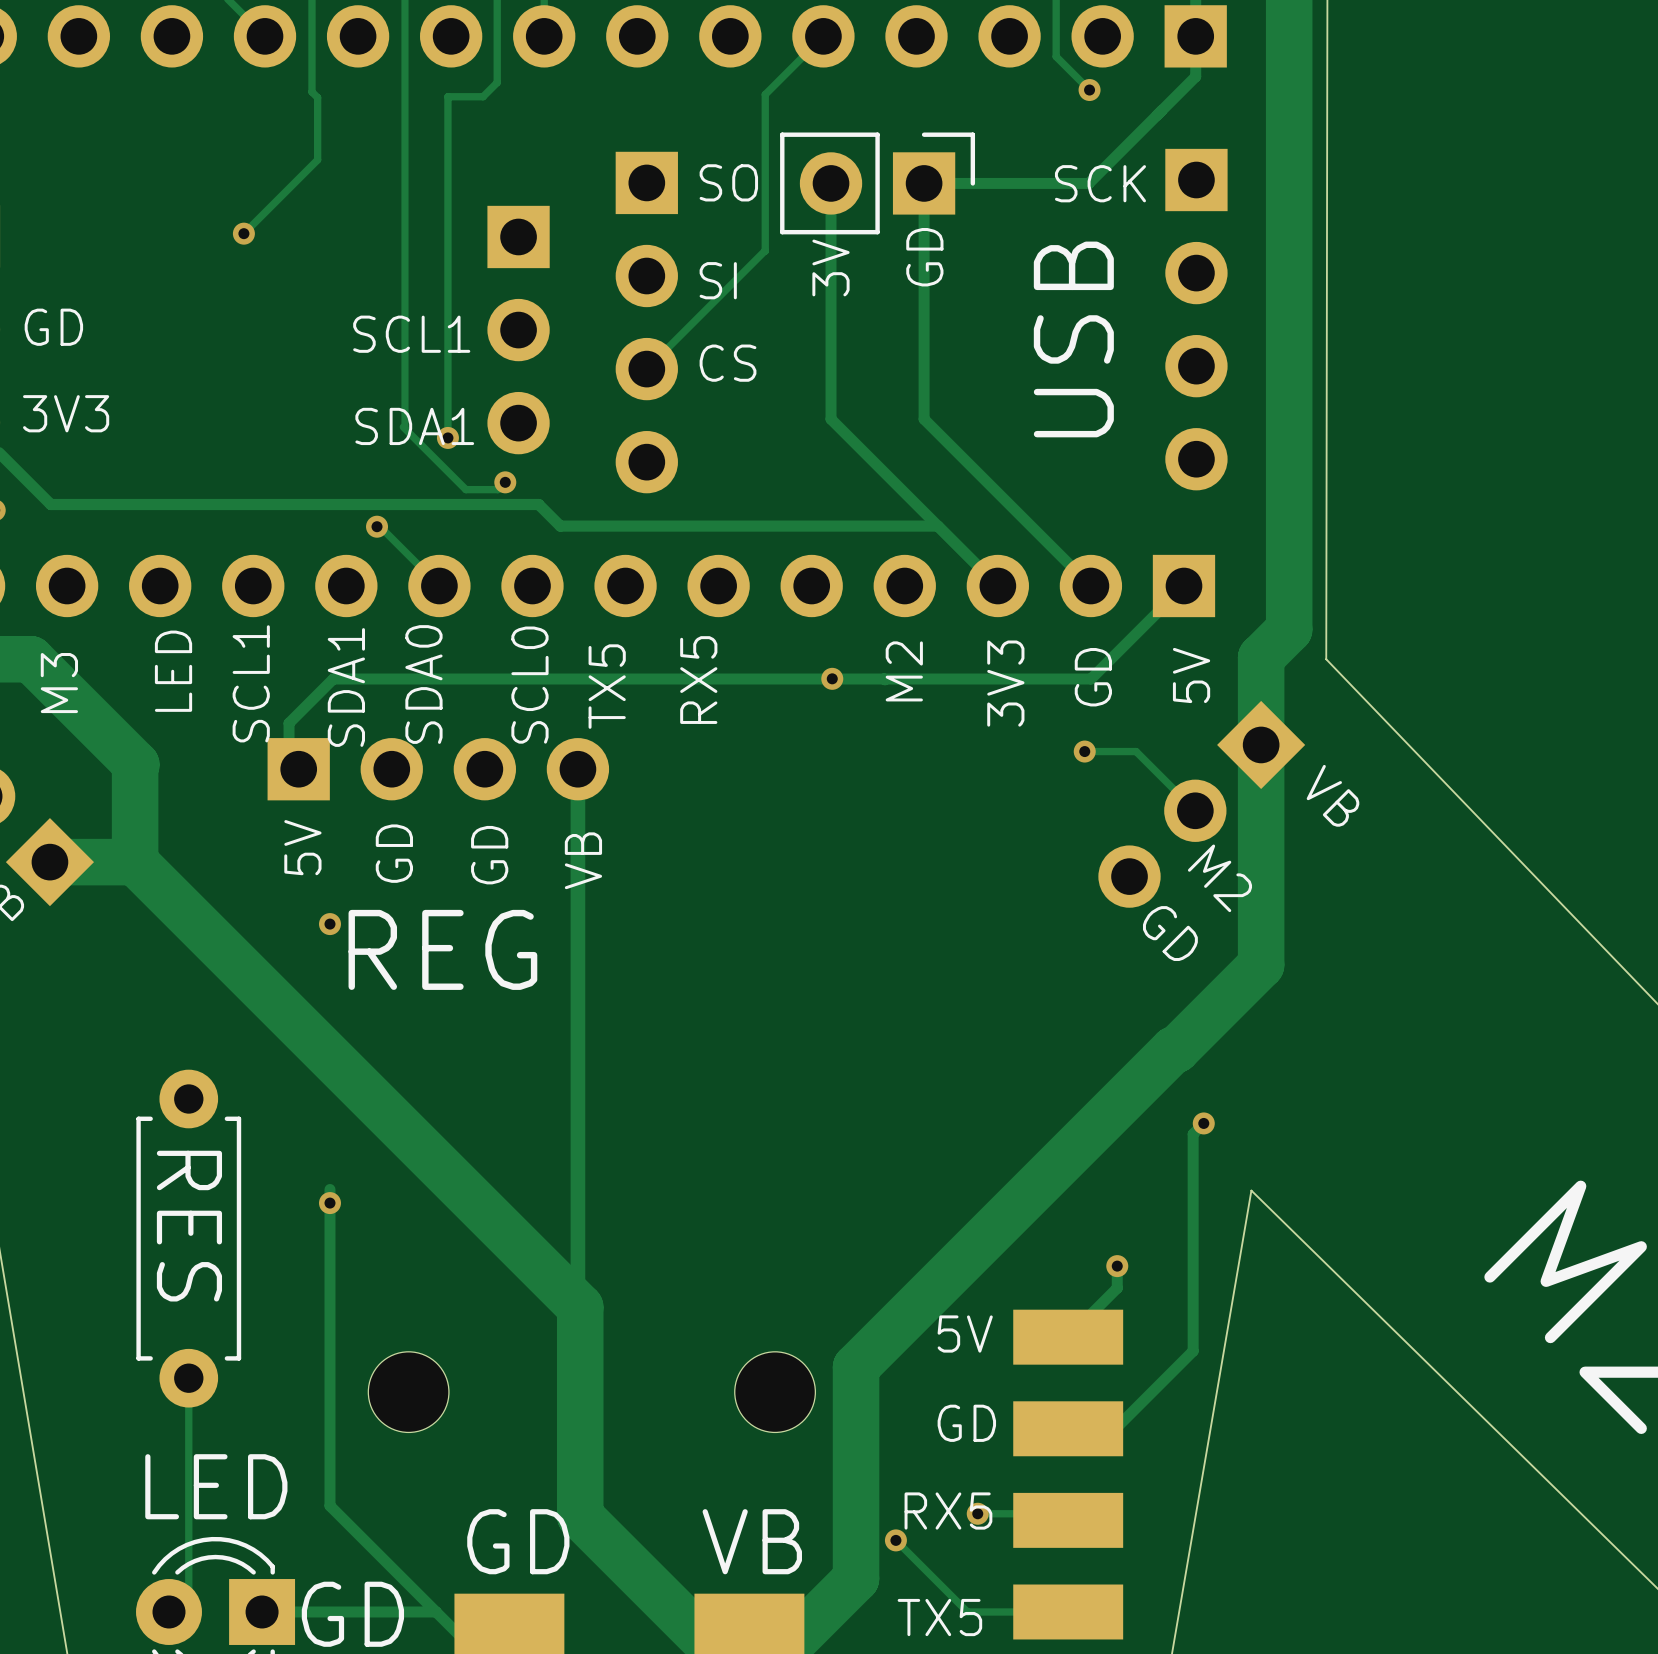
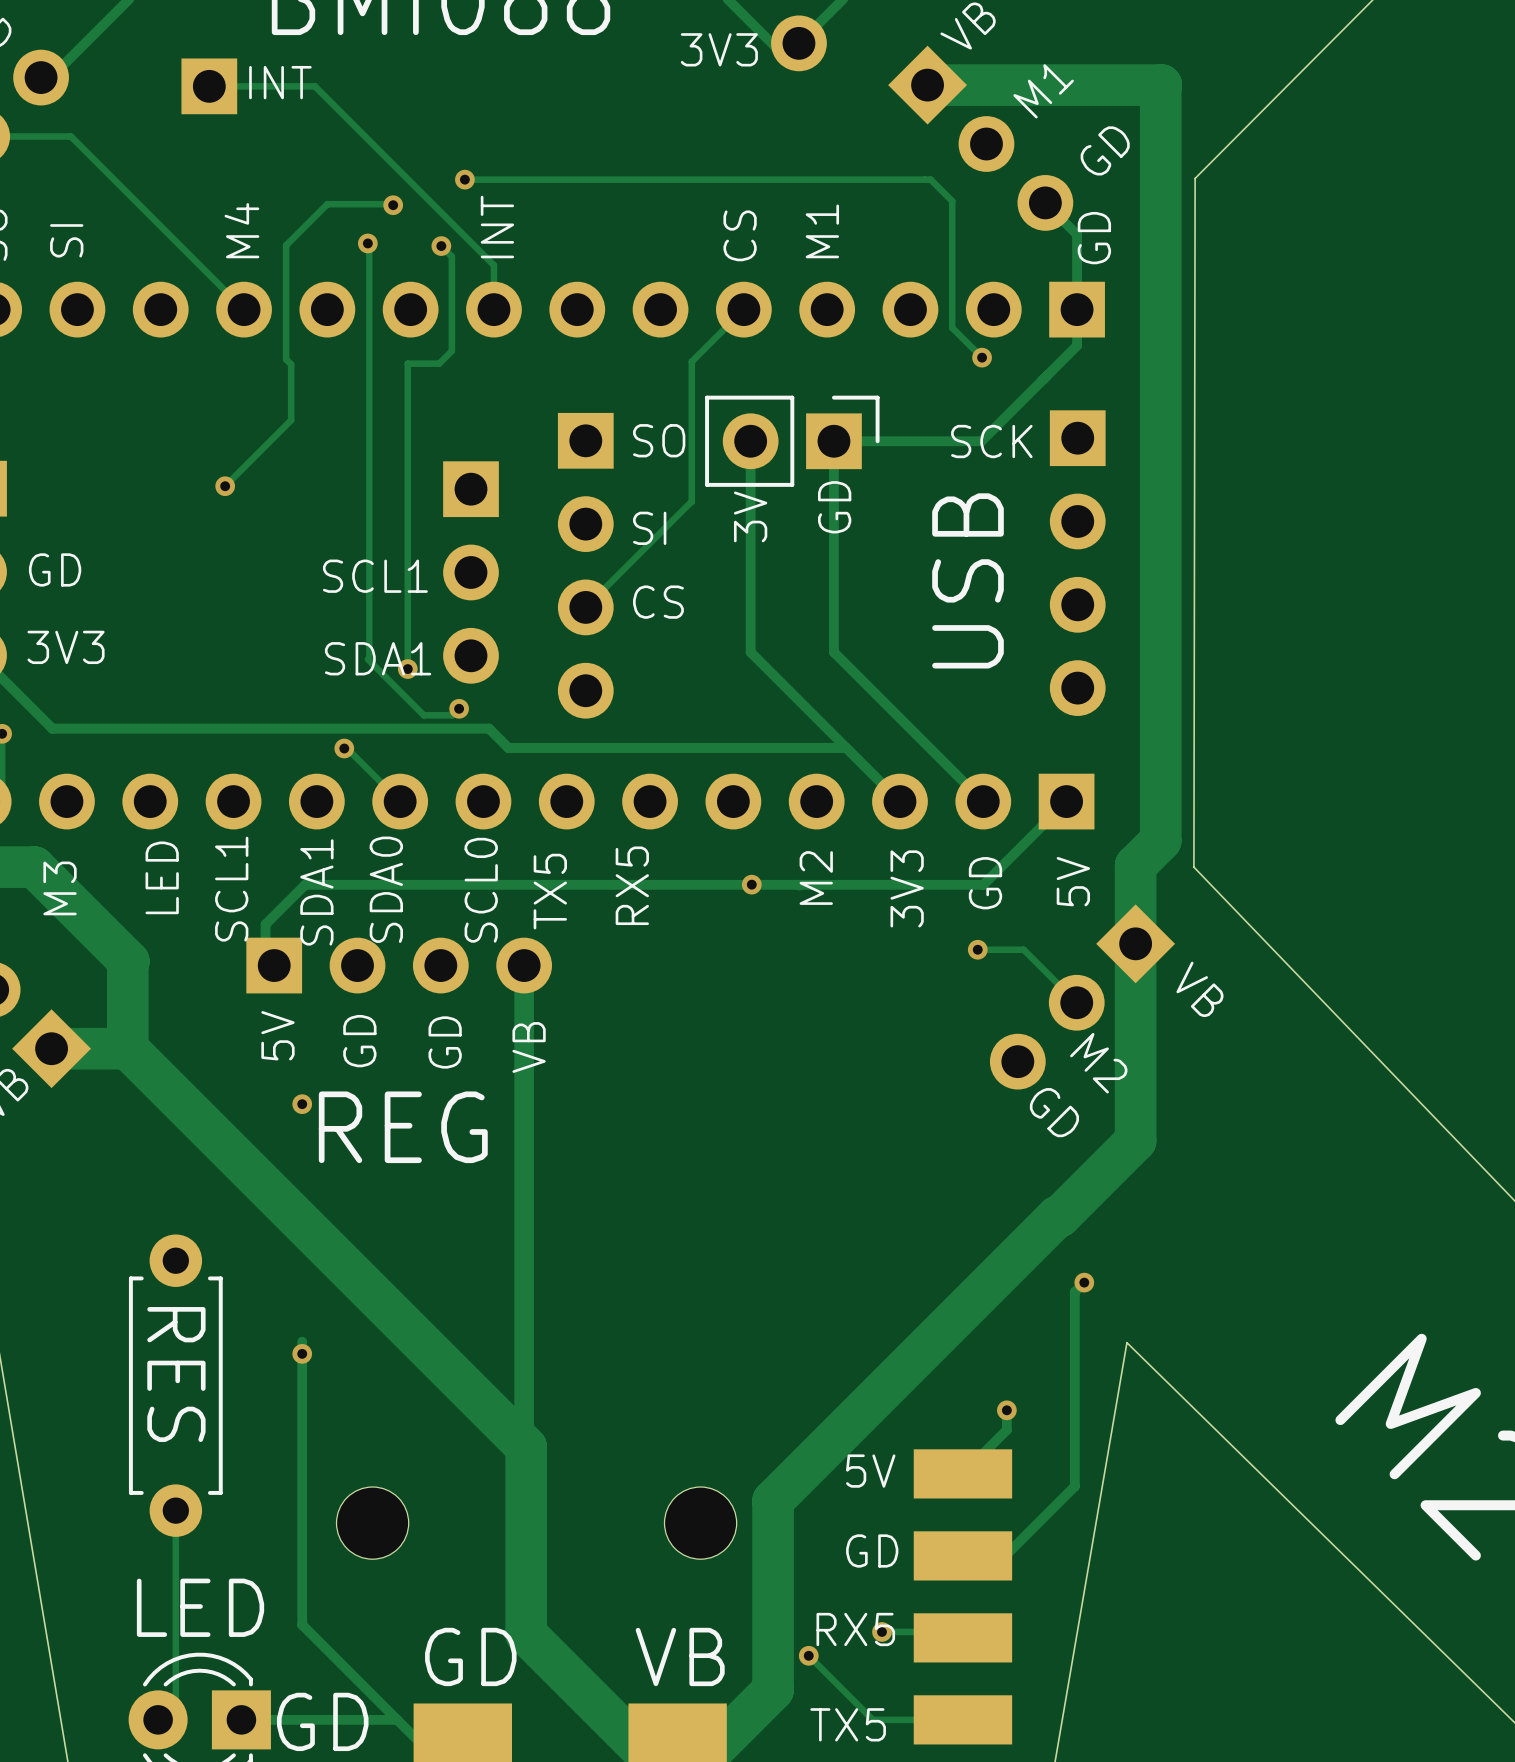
track width: thin (577, 769) (577, 1304) -> thick (524, 965) (524, 1445)

